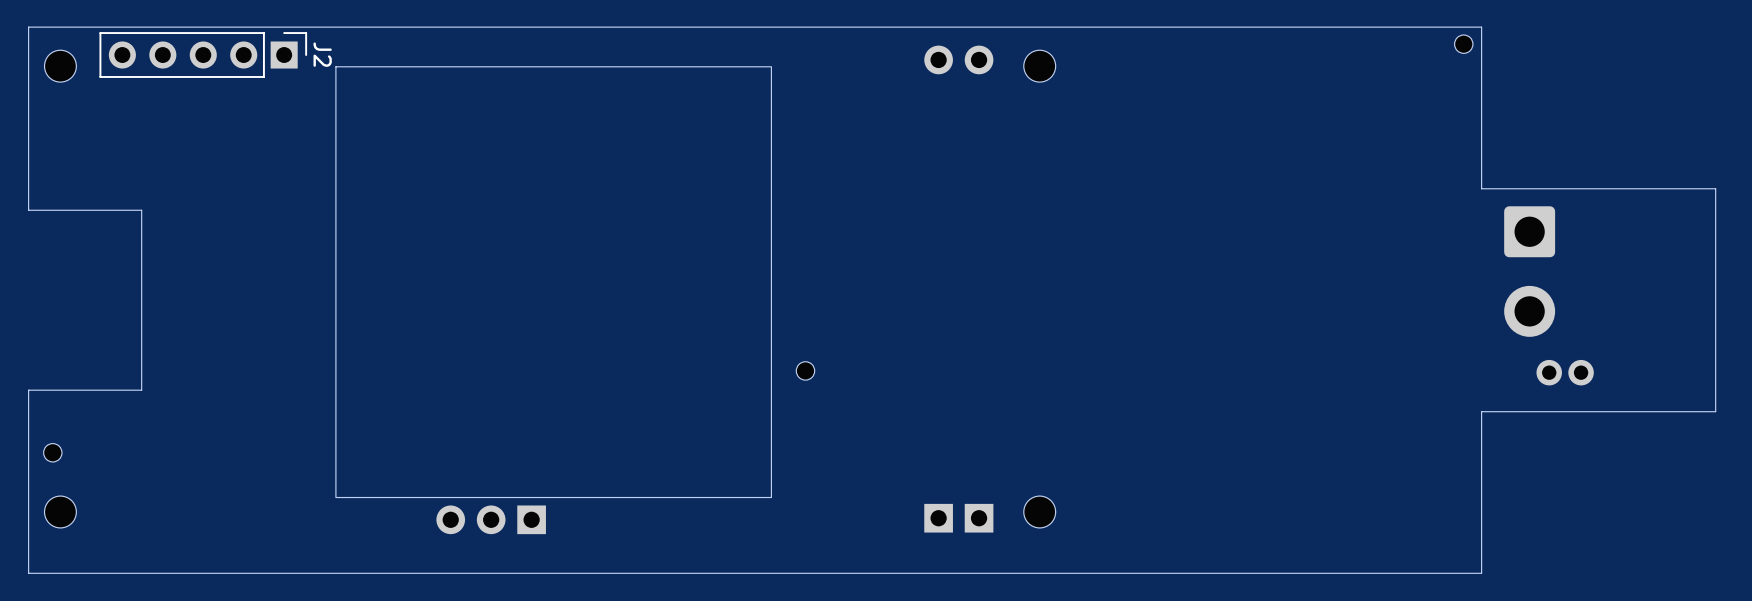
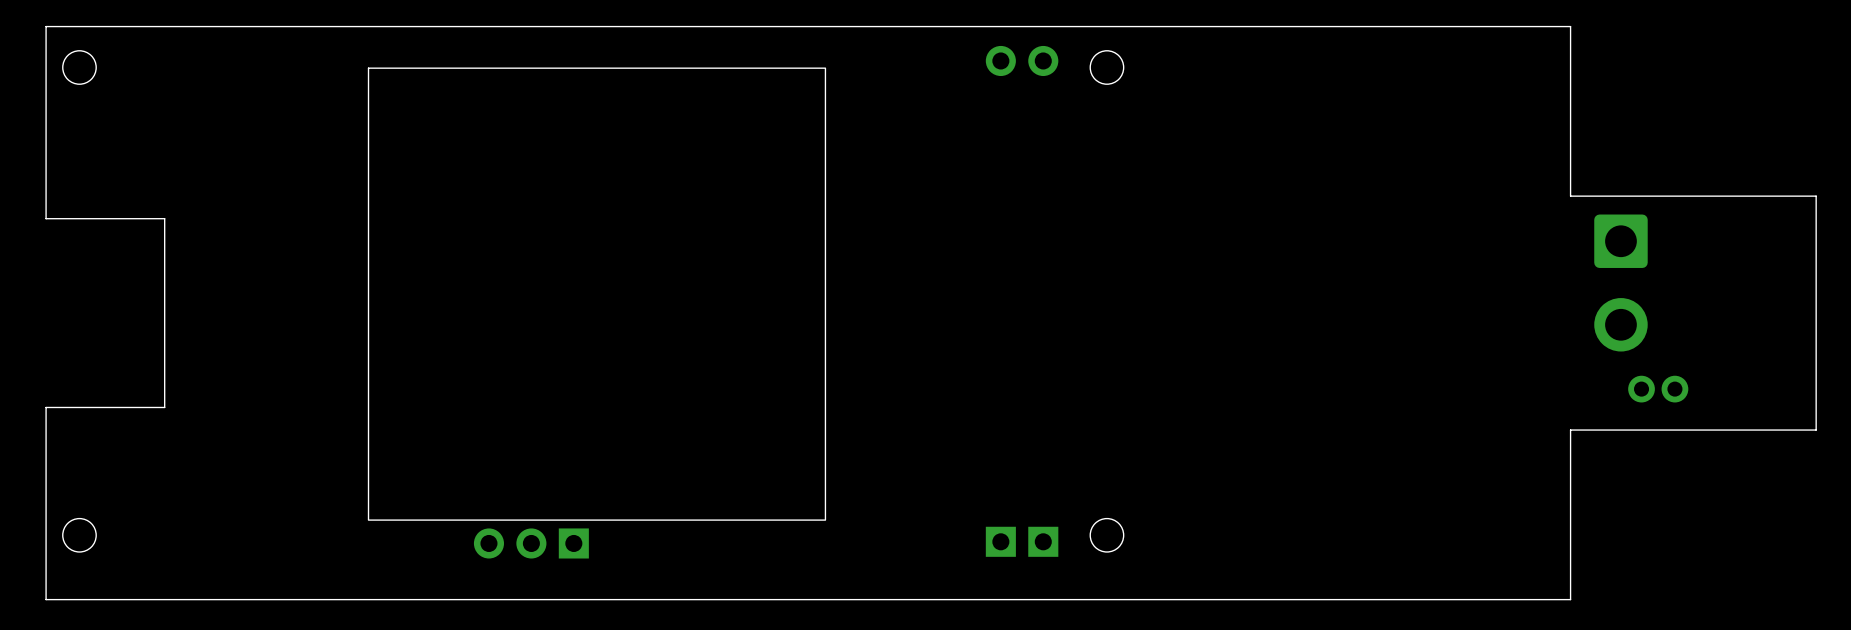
part: (1463, 44) -> none
J2: (203, 55) -> none
part: (805, 370) -> none
part: (52, 452) -> none

